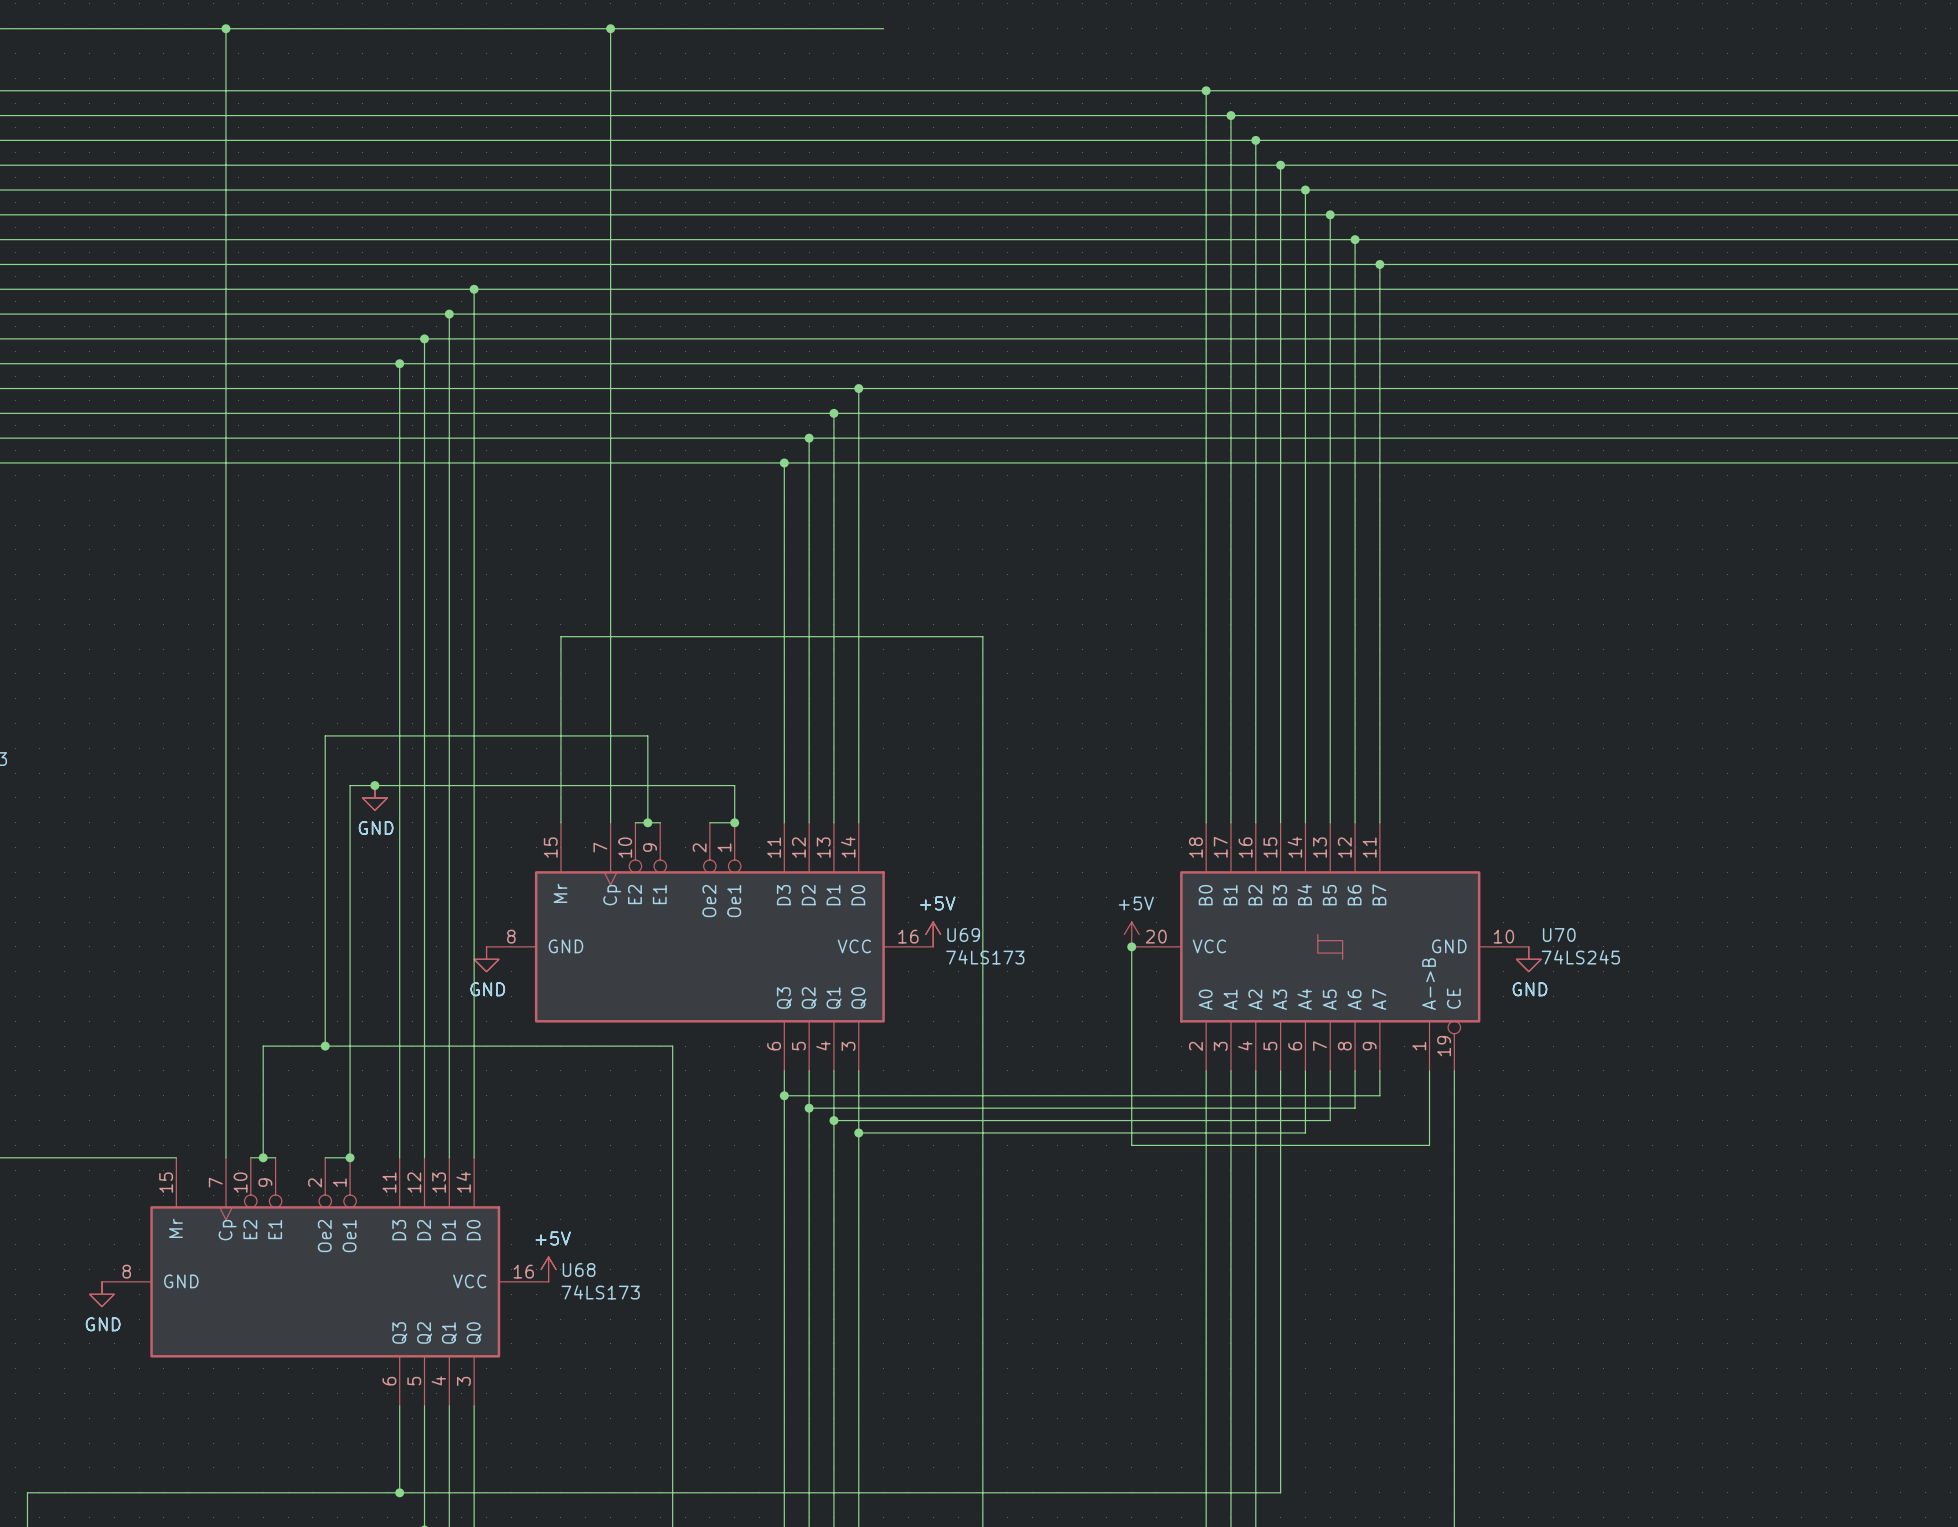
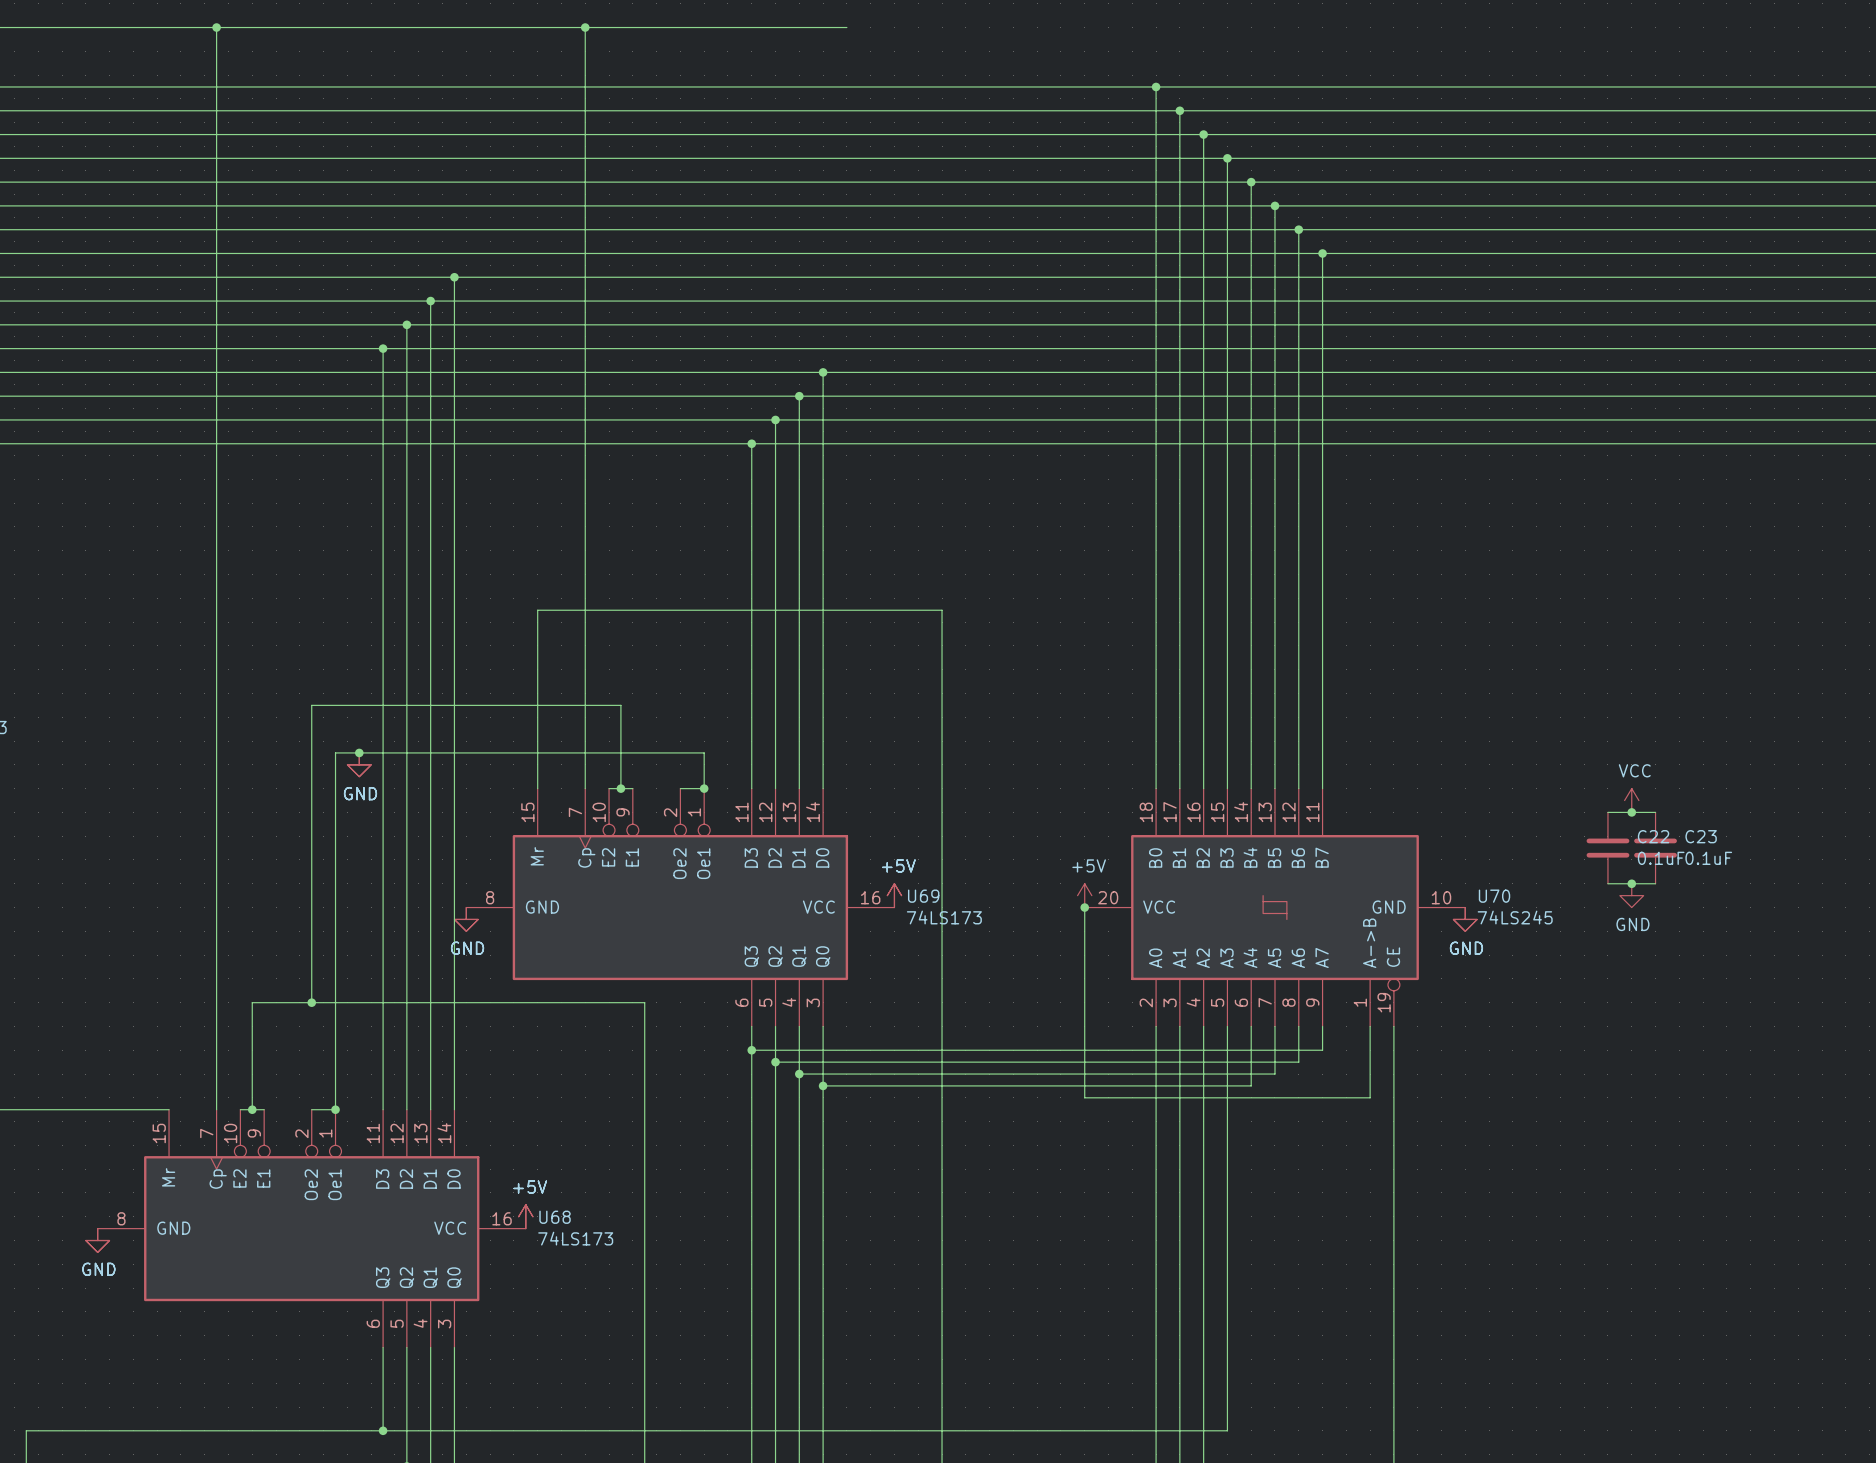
power symbol: none -> VCC (1631, 800)
wire: none -> (1607, 812) (1655, 812)
junction: none -> (1631, 812)
C22: none -> 0.1uF (1607, 848)
C23: none -> 0.1uF (1655, 848)
wire: none -> (1607, 883) (1655, 883)
junction: none -> (1631, 883)
power symbol: none -> GND (1631, 895)

